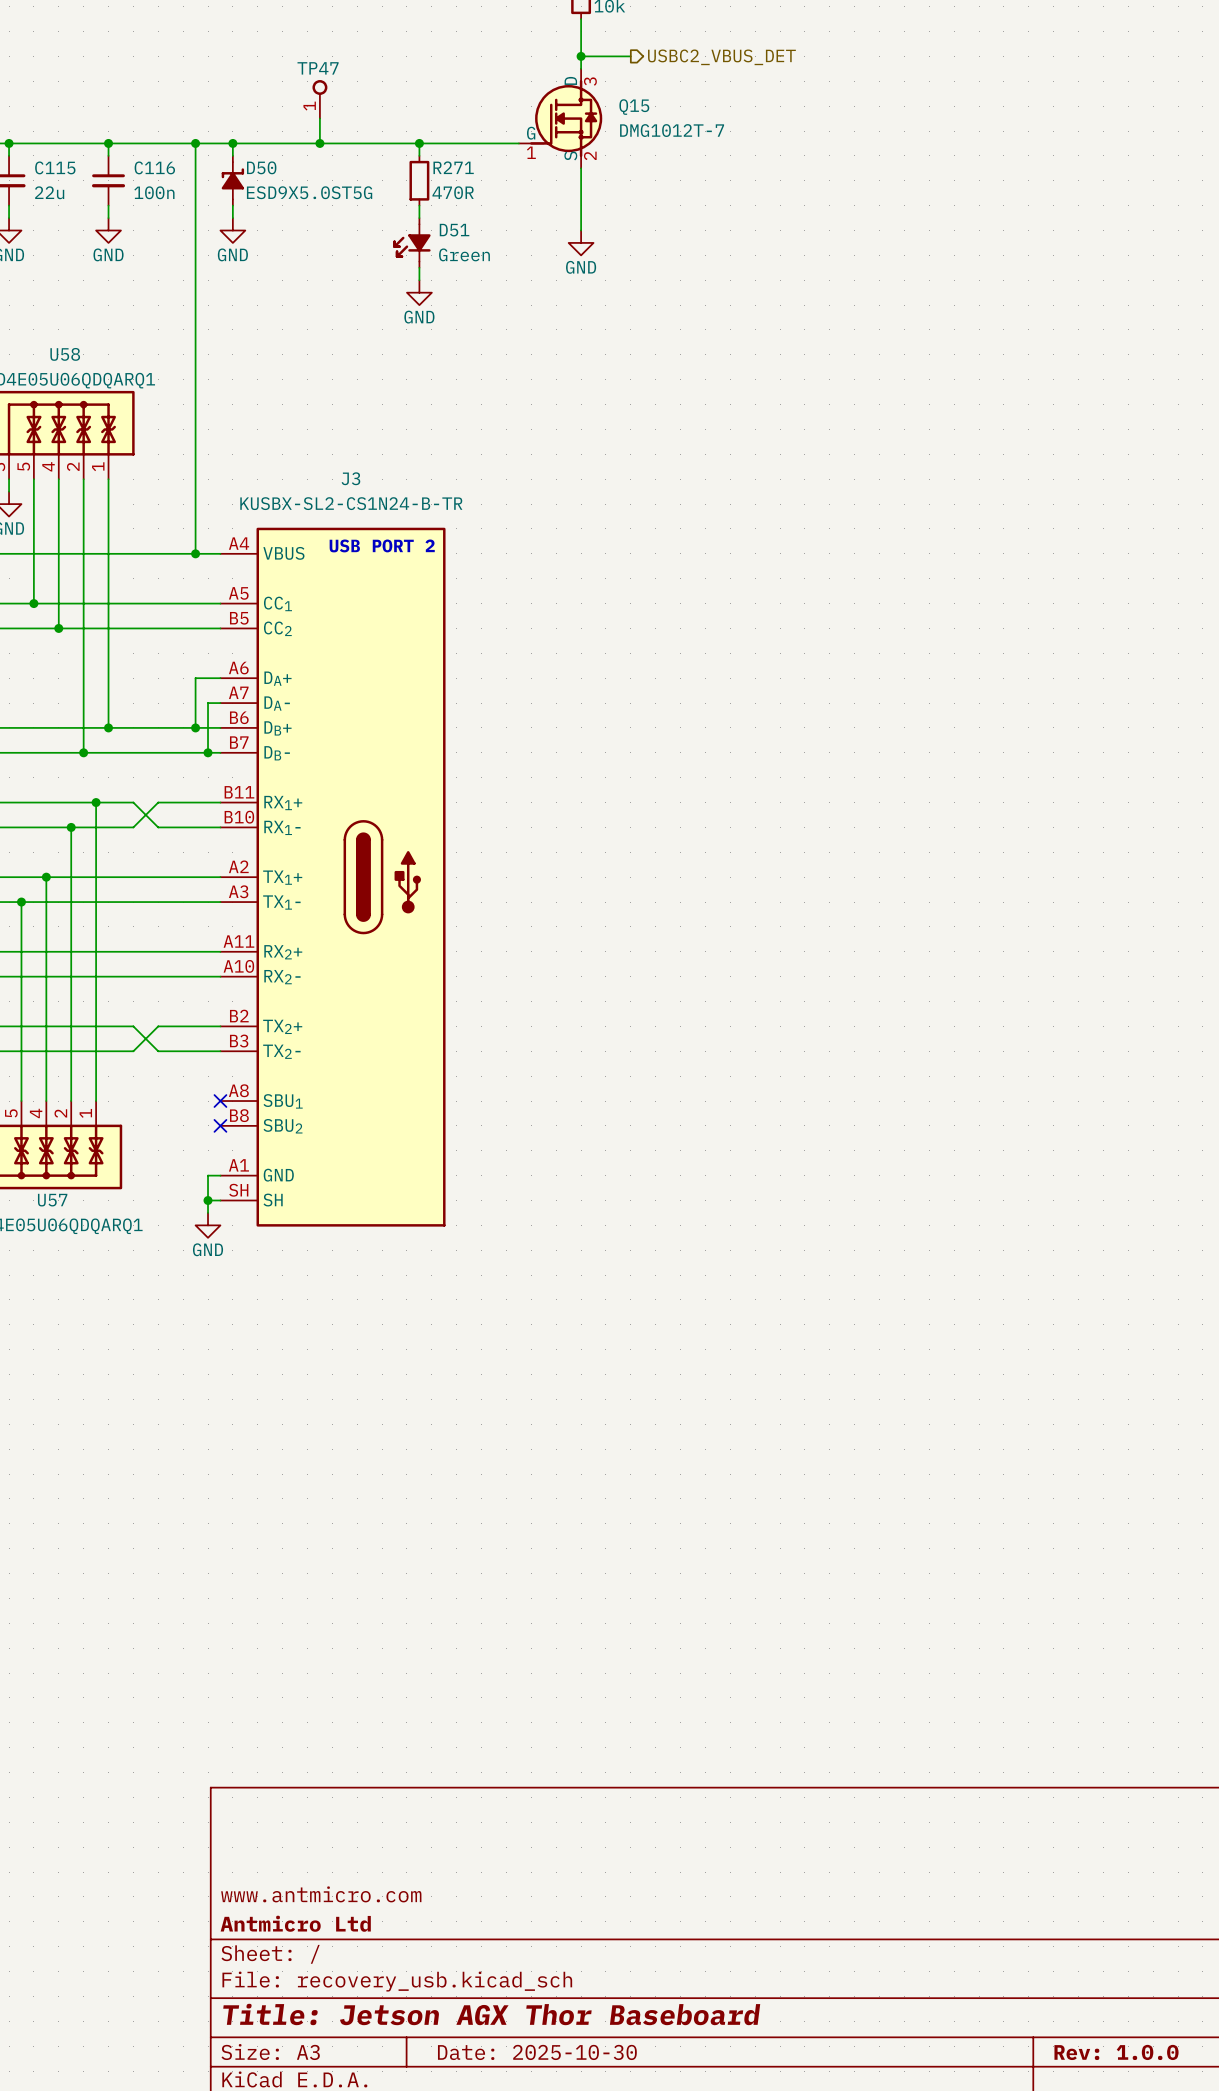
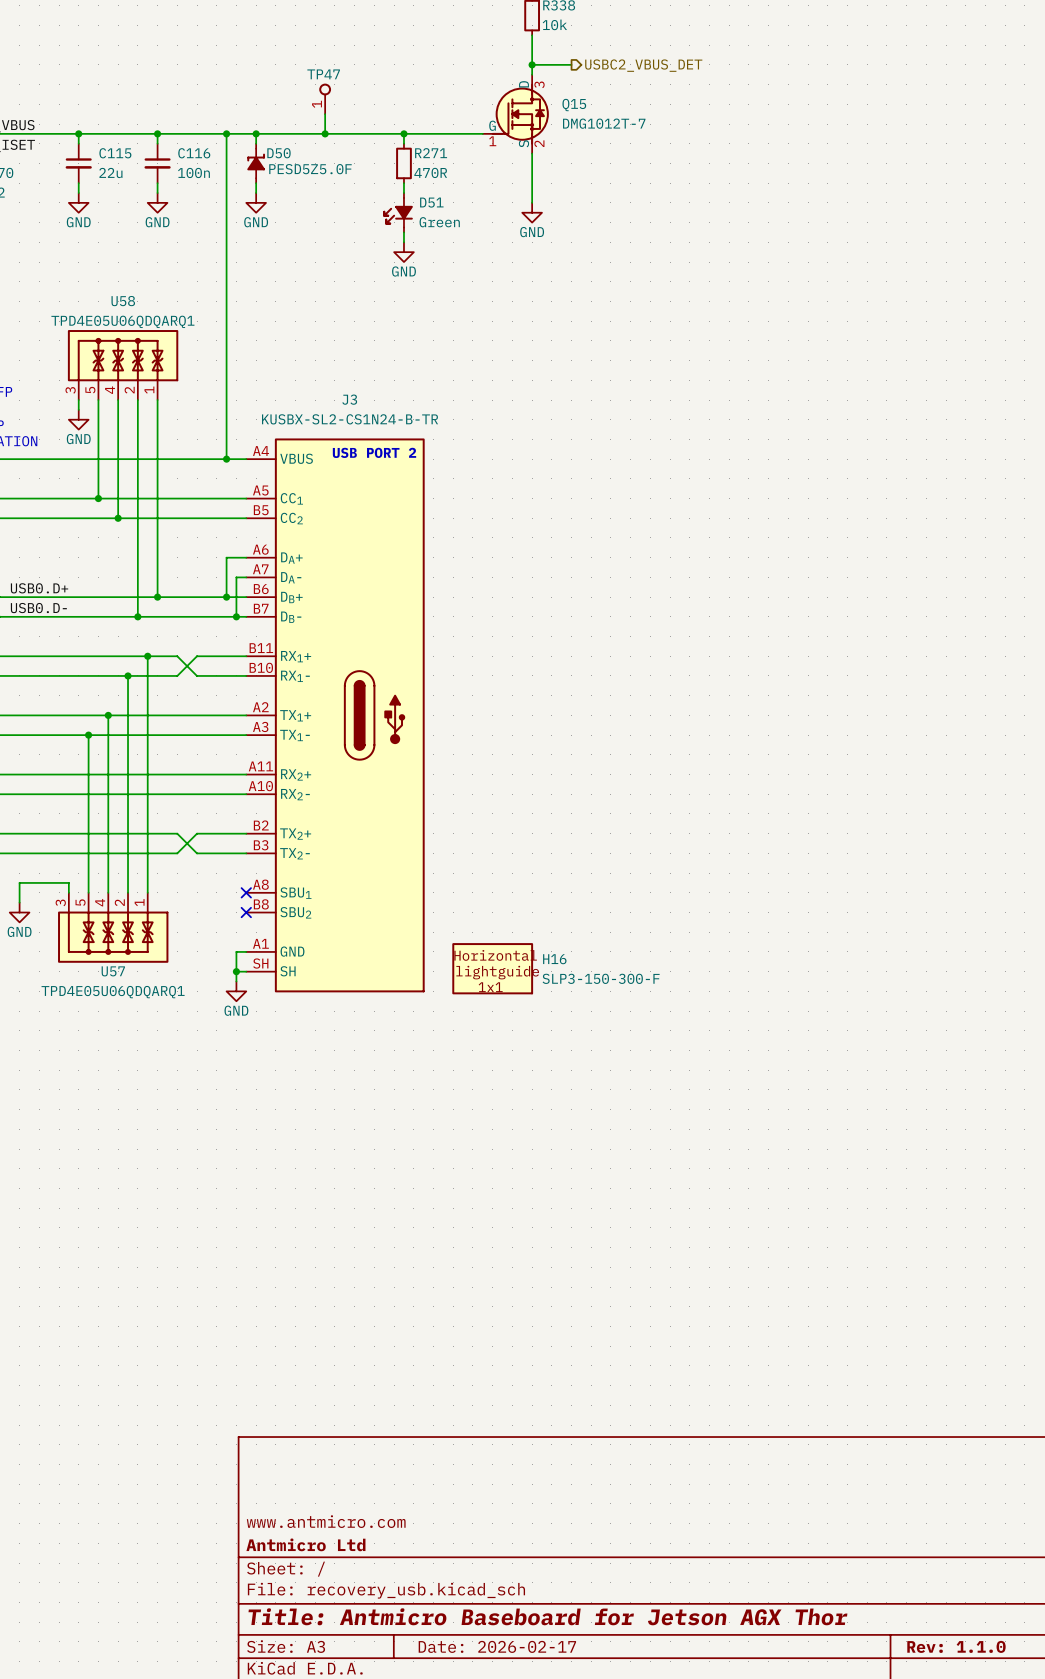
D50 text: ESD9X5.0ST5G (309, 192) -> PESD5Z5.0F (310, 169)
H16: none -> (492, 968)
title block: Title: Jetson AGX Thor Baseboard (491, 2014) -> Title: Antmicro Baseboard for Jetson AGX Thor (547, 1616)
title block: Date: 2025-10-30 (537, 2052) -> Date: 2026-02-17 (497, 1646)
title block: Rev: 1.0.0 (1116, 2052) -> Rev: 1.1.0 (956, 1646)

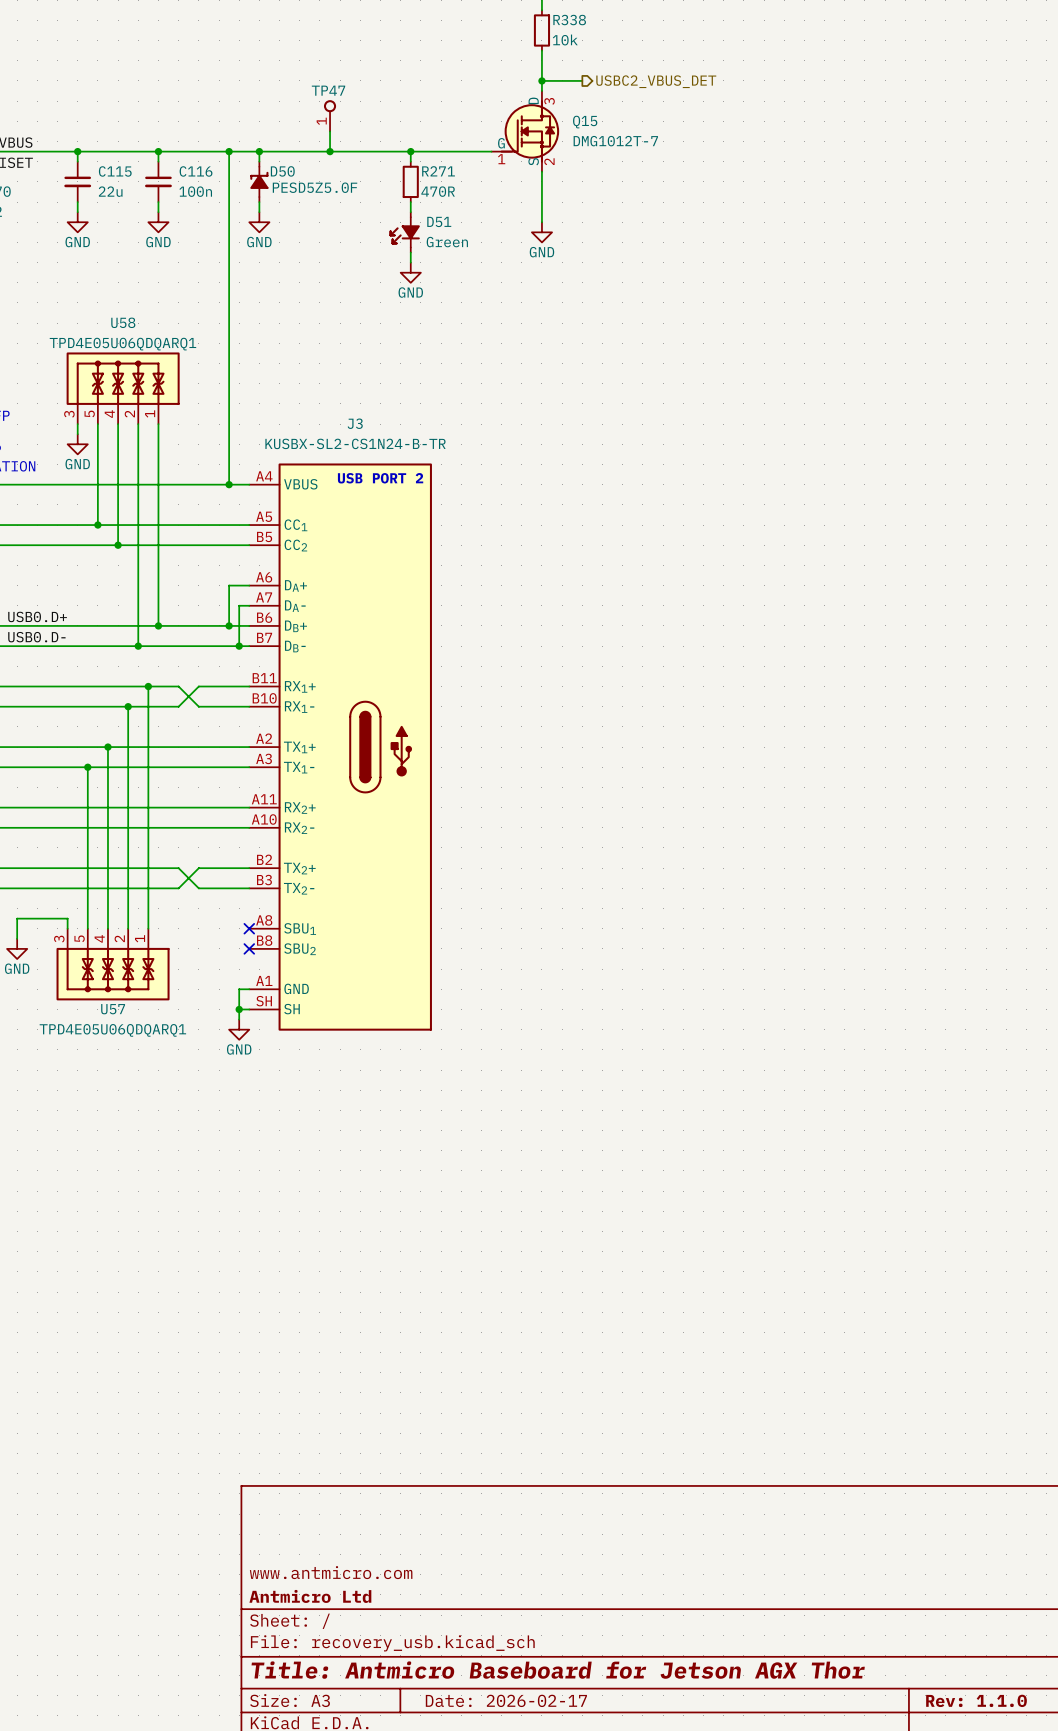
H16: (492, 968) -> none

